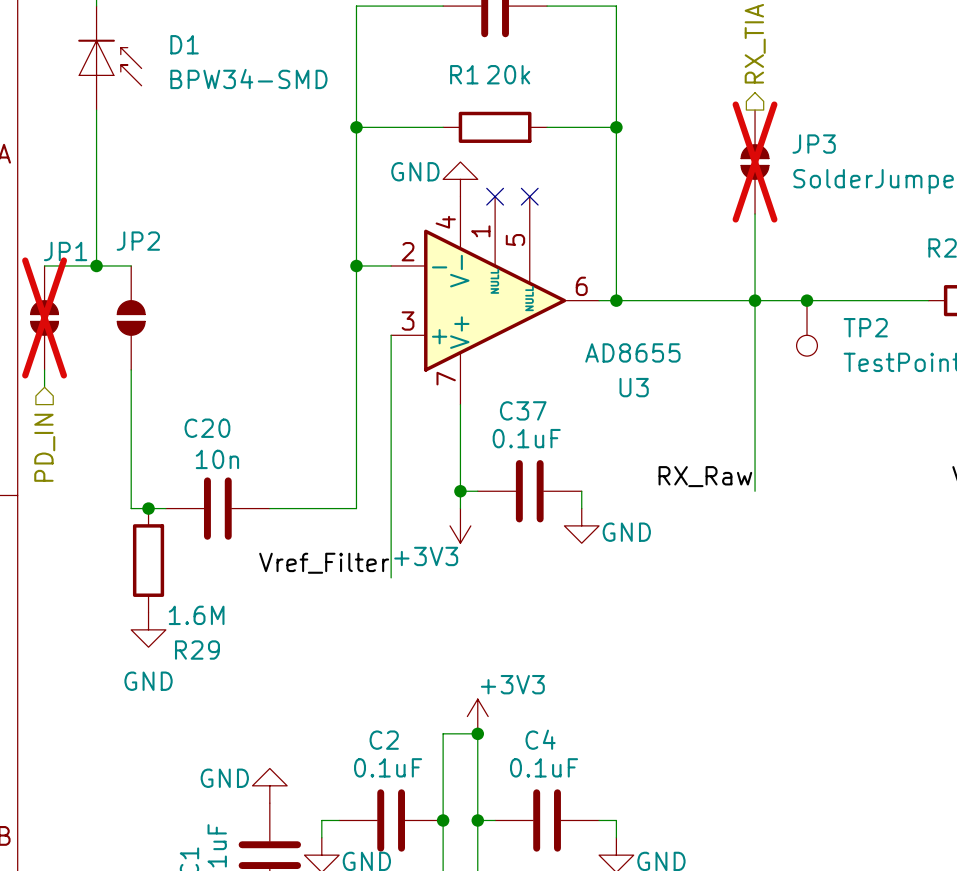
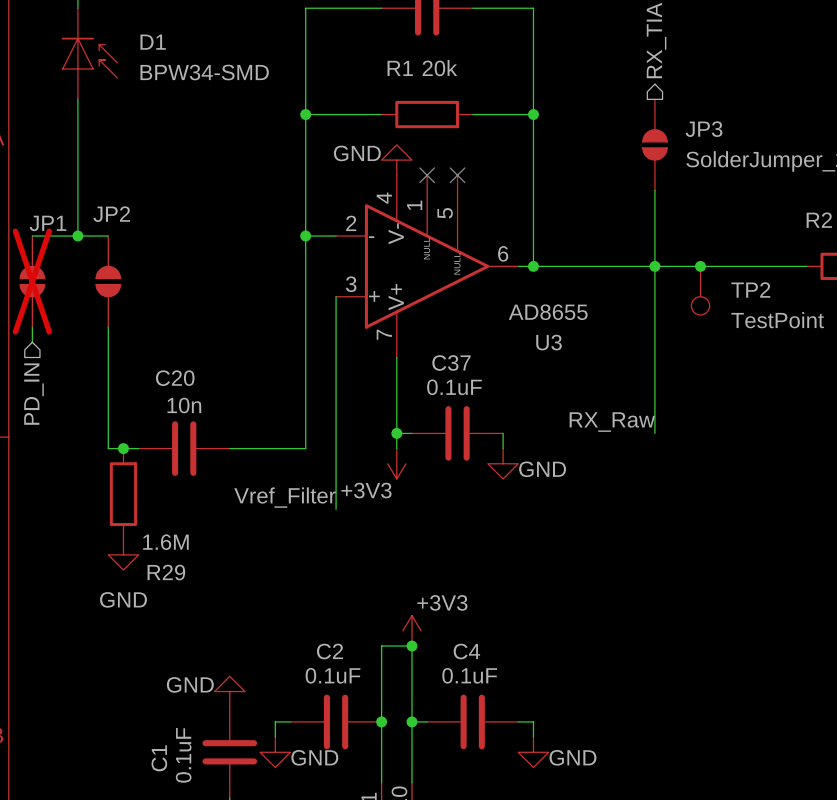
JP3 do-not-place cross: (755, 162) -> none

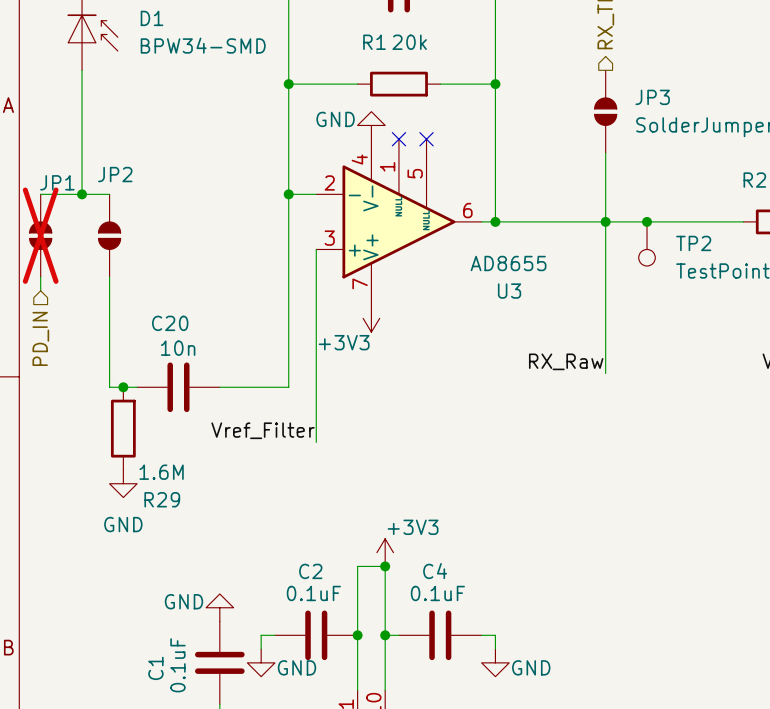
wire: (396, 357) (396, 448) -> none
wire: (396, 433) (411, 433) -> none
junction: (396, 433) -> none
C37: 0.1uF (457, 433) -> none
wire: (503, 433) (503, 448) -> none
power symbol position: +3V3 (396, 463) -> +3V3 (371, 318)
power symbol: GND (503, 463) -> none

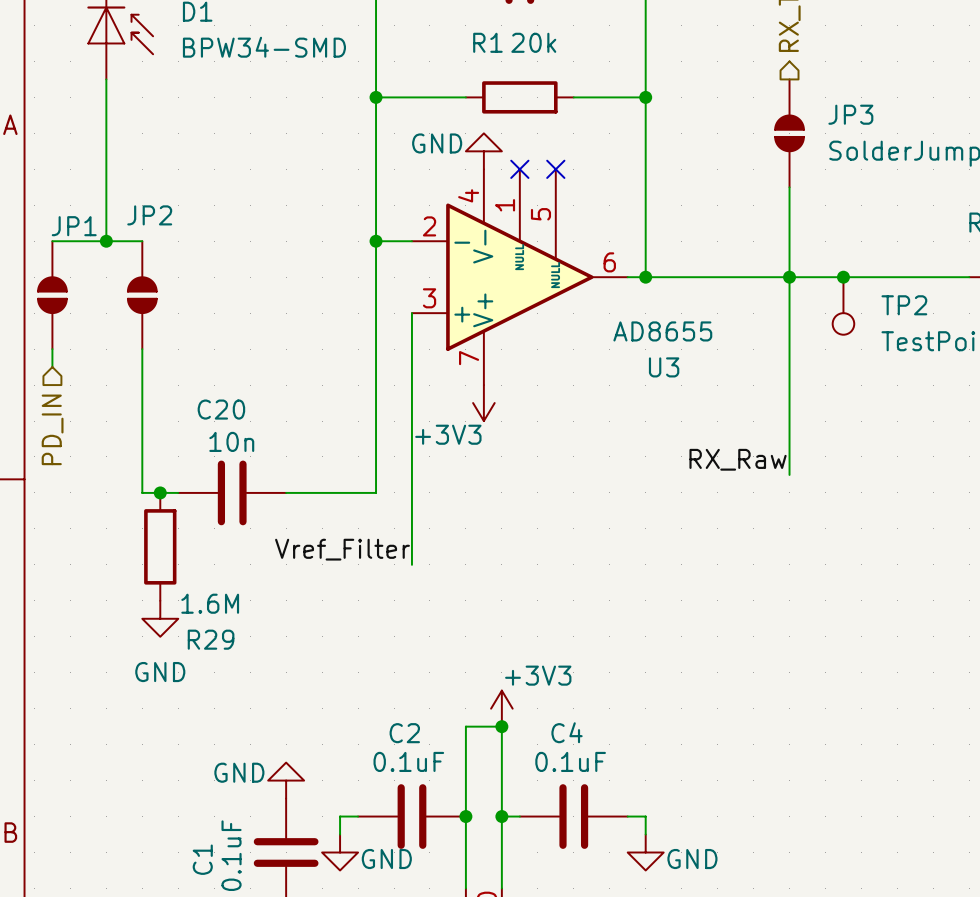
JP1 do-not-place cross: (40, 235) -> none

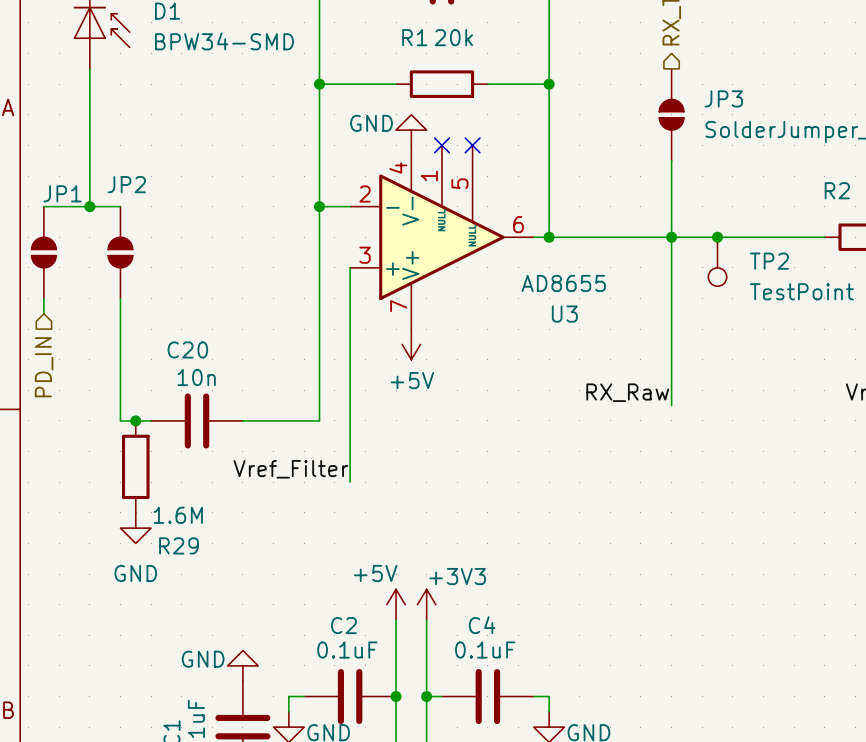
power symbol: +3V3 (483, 403) -> +5V (411, 344)
power symbol: none -> +5V (396, 604)
wire: (465, 726) (501, 726) -> none
junction: (501, 726) -> none

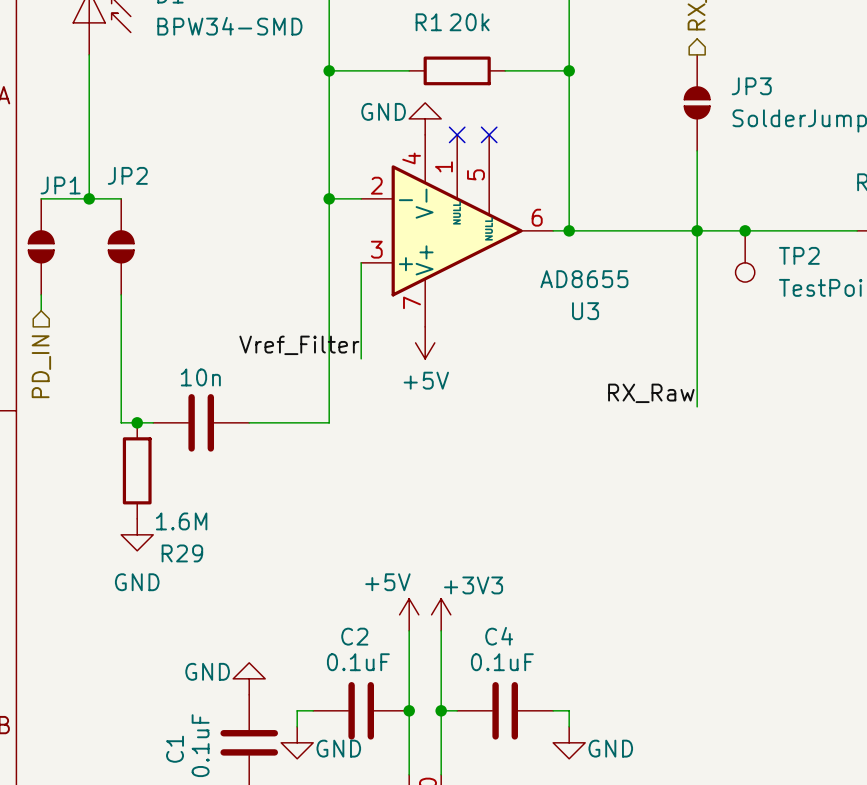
C20 name: C20 (187, 349) -> none
wire: (350, 359) (350, 482) -> none
label position: Vref_Filter (290, 469) -> Vref_Filter (299, 345)

